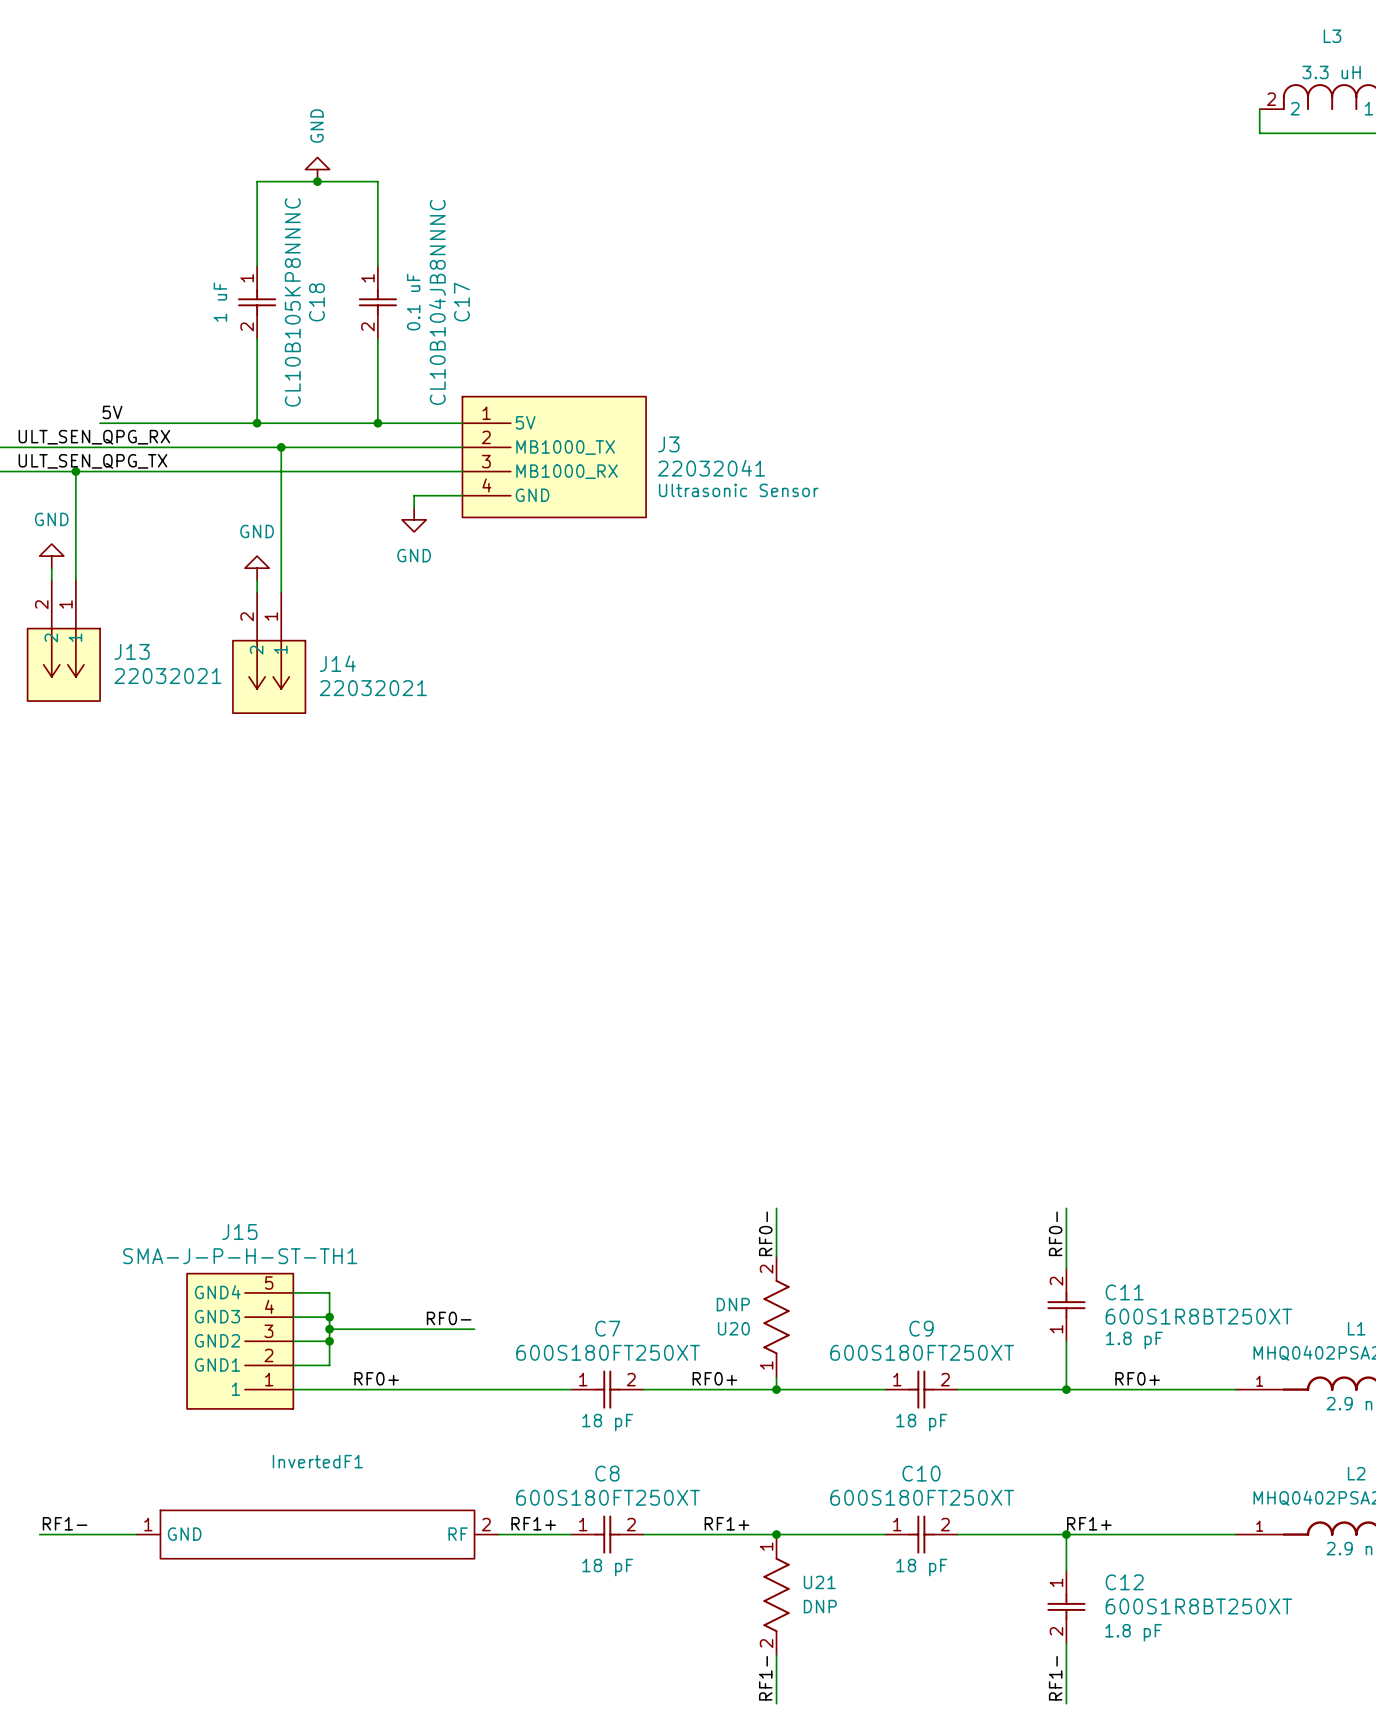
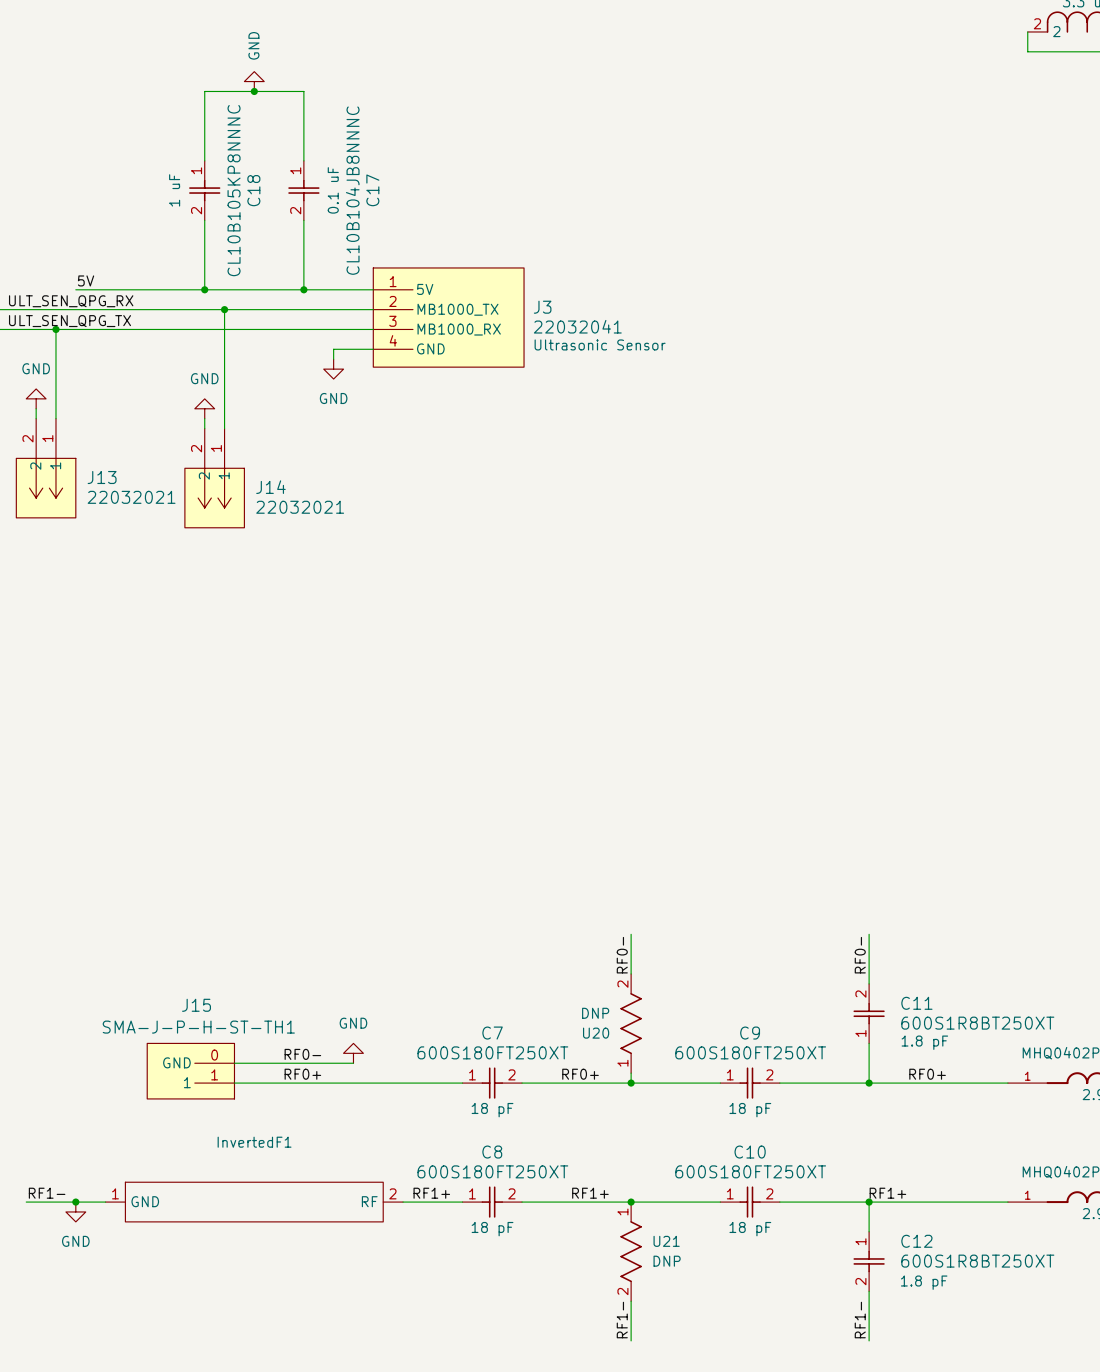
J15 name position: J15 (239, 1232) -> J15 (196, 1005)
J15 value position: SMA-J-P-H-ST-TH1 (240, 1256) -> SMA-J-P-H-ST-TH1 (198, 1027)
J15 symbol: [187, 1273, 294, 1409] -> [147, 1043, 235, 1099]
wire: (293, 1292) (329, 1292) (329, 1365) -> (353, 1063) (264, 1063)
wire: (293, 1317) (329, 1317) -> none
junction: (329, 1317) -> none
label position: RF0- (449, 1318) -> RF0- (302, 1054)
wire: (329, 1329) (474, 1329) -> none
junction: (329, 1329) -> none
wire: (293, 1341) (329, 1341) -> none
junction: (329, 1341) -> none
power symbol: none -> GND (353, 1053)
junction: none -> (75, 1202)
power symbol: none -> GND (75, 1211)

